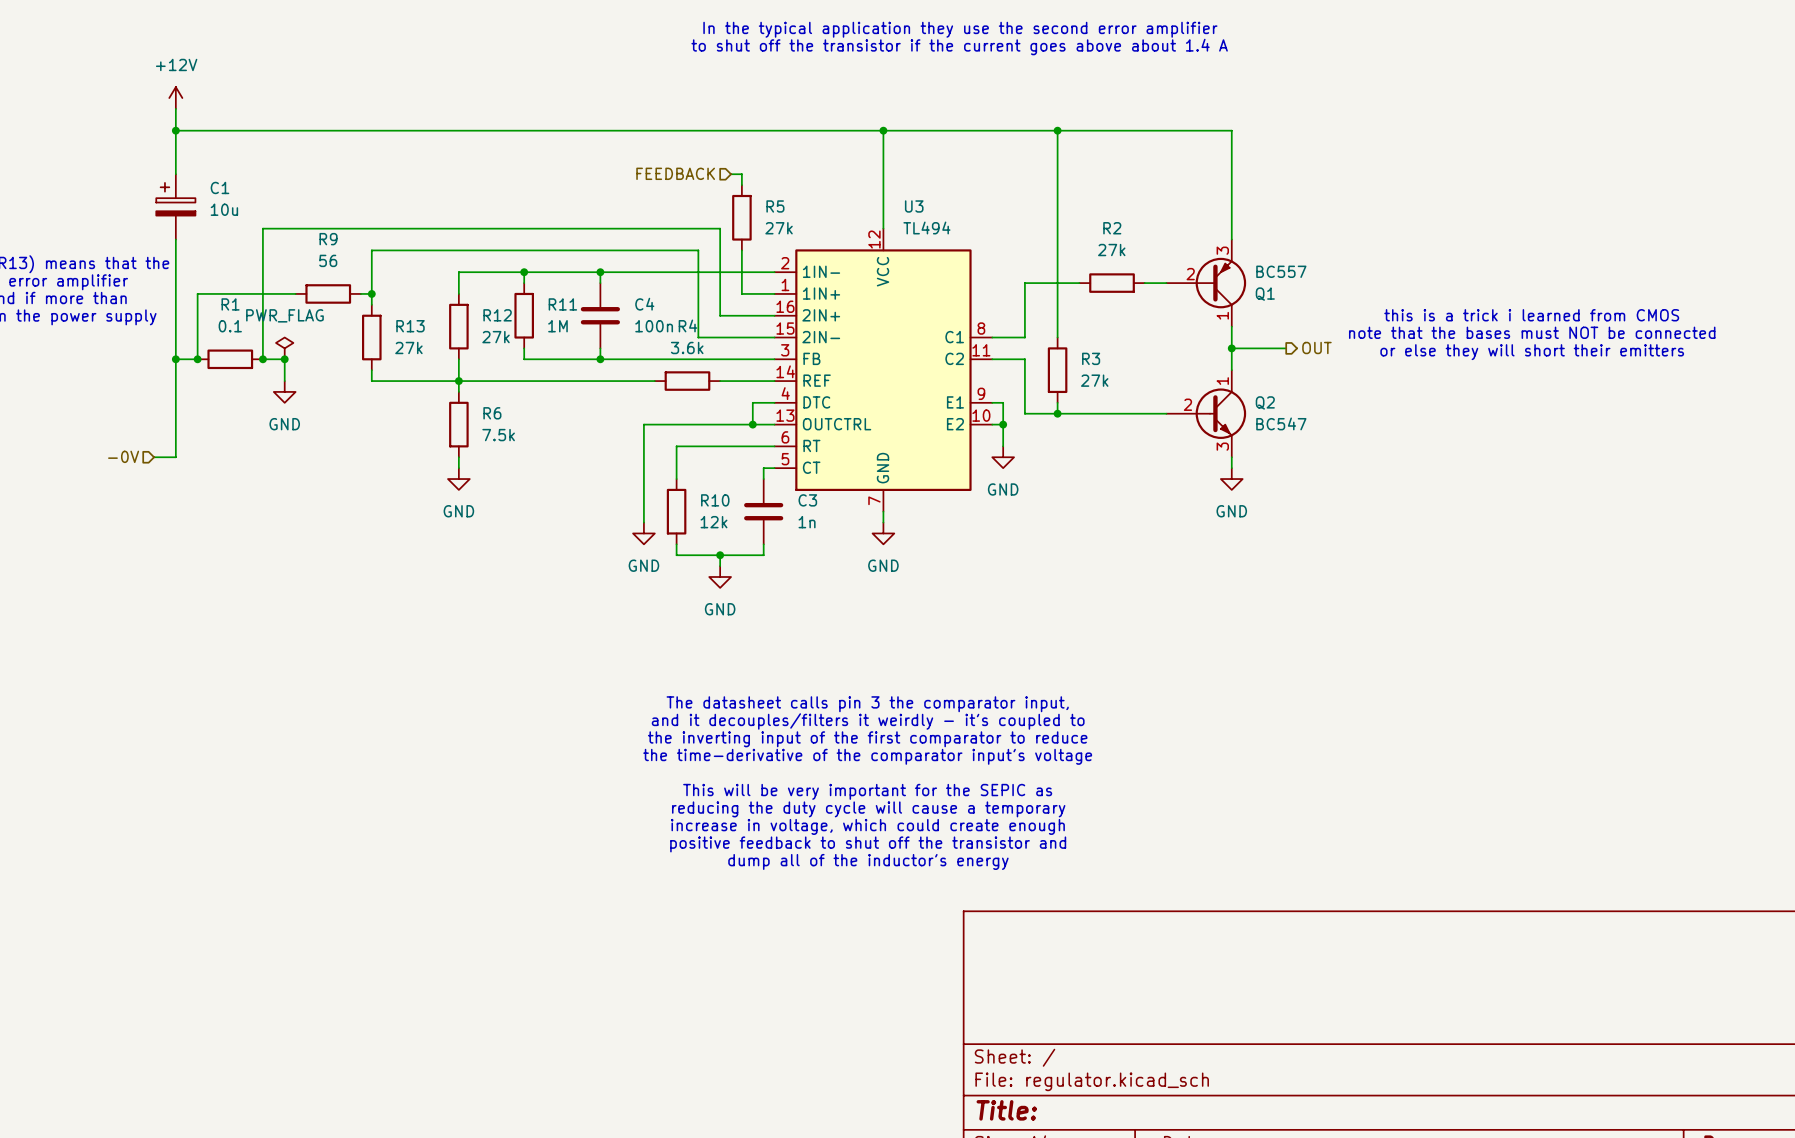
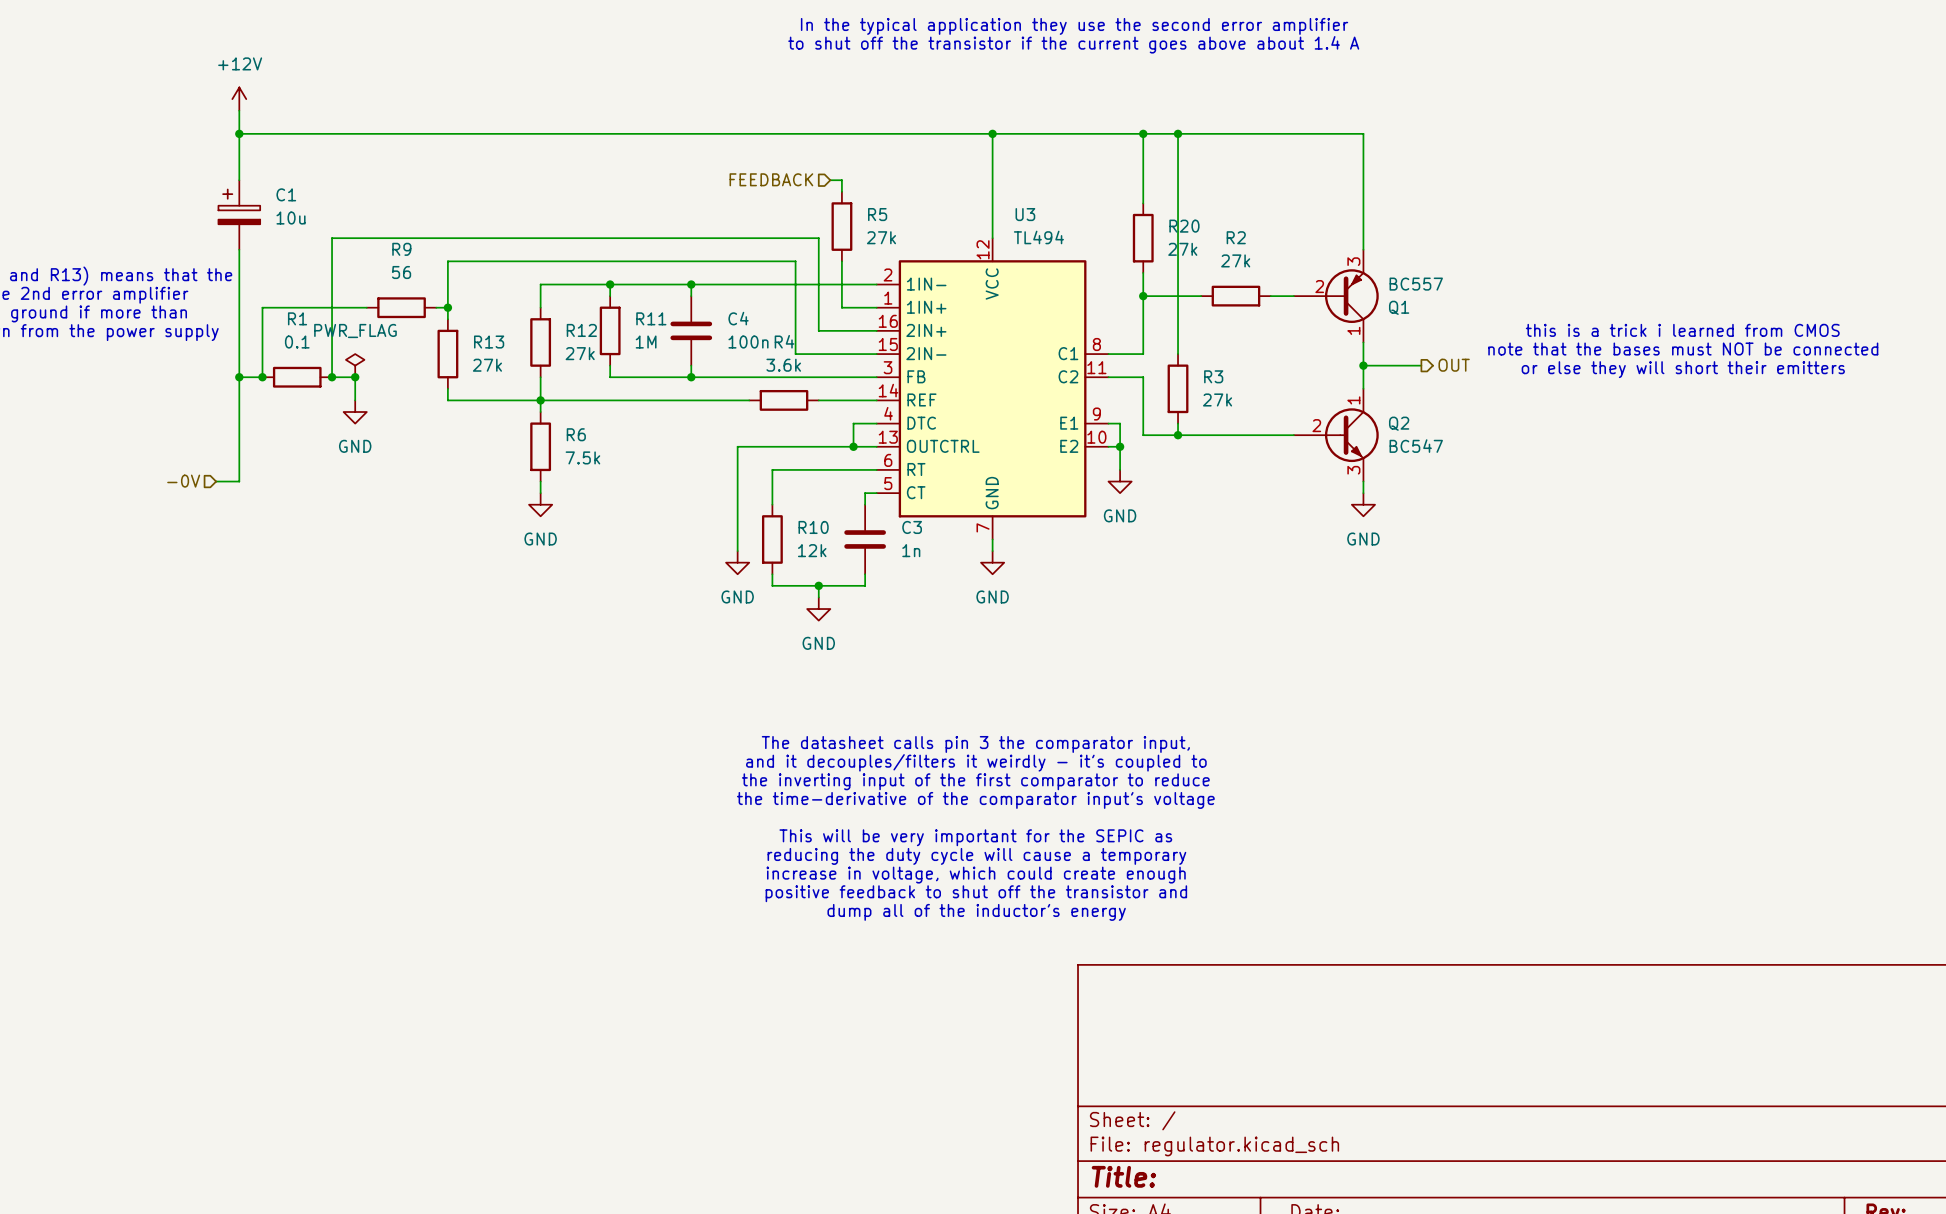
wire: none -> (1143, 133) (1143, 203)
junction: none -> (1143, 133)
R20: none -> 27k (1143, 238)
wire: none -> (1143, 272) (1143, 296)
junction: none -> (1143, 296)

